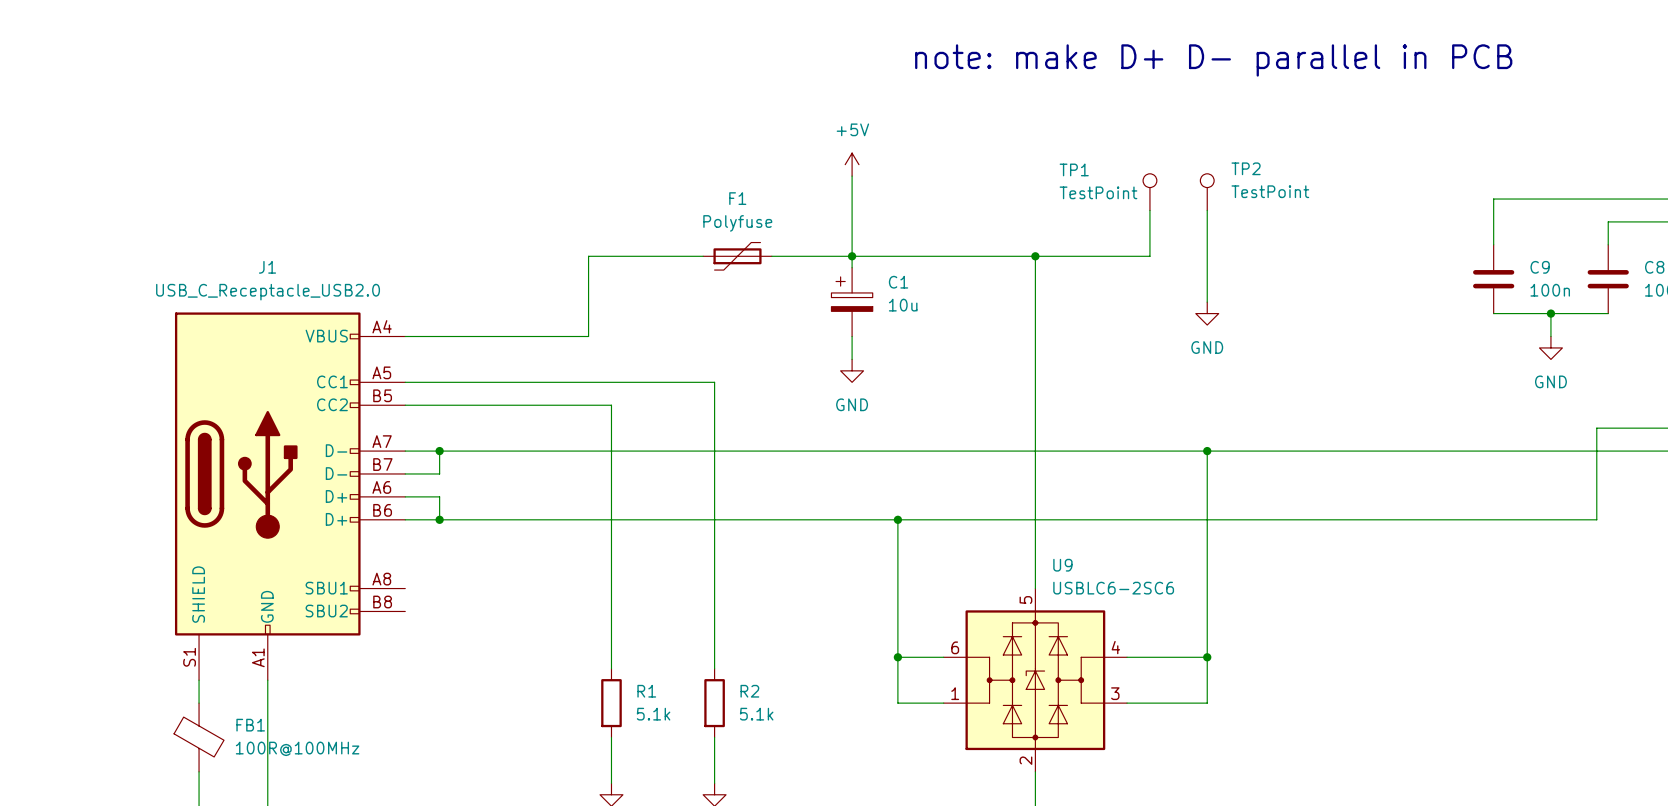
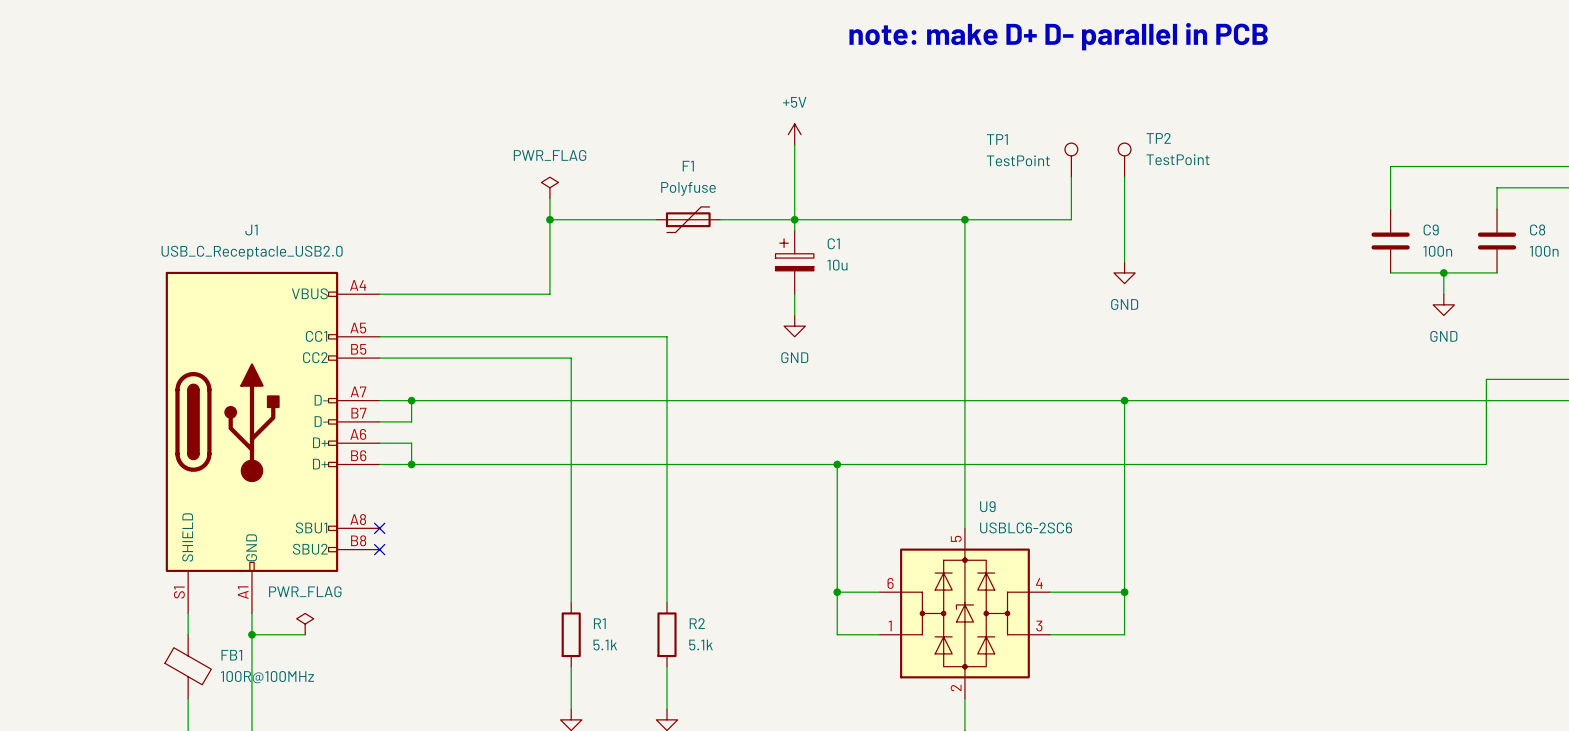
power symbol: none -> PWR_FLAG (549, 187)
wire: none -> (549, 198) (549, 219)
junction: none -> (549, 219)
no-connect mark: none -> (379, 528)
no-connect mark: none -> (379, 549)
power symbol: none -> PWR_FLAG (305, 624)
wire: none -> (251, 634) (305, 634)
junction: none -> (251, 634)

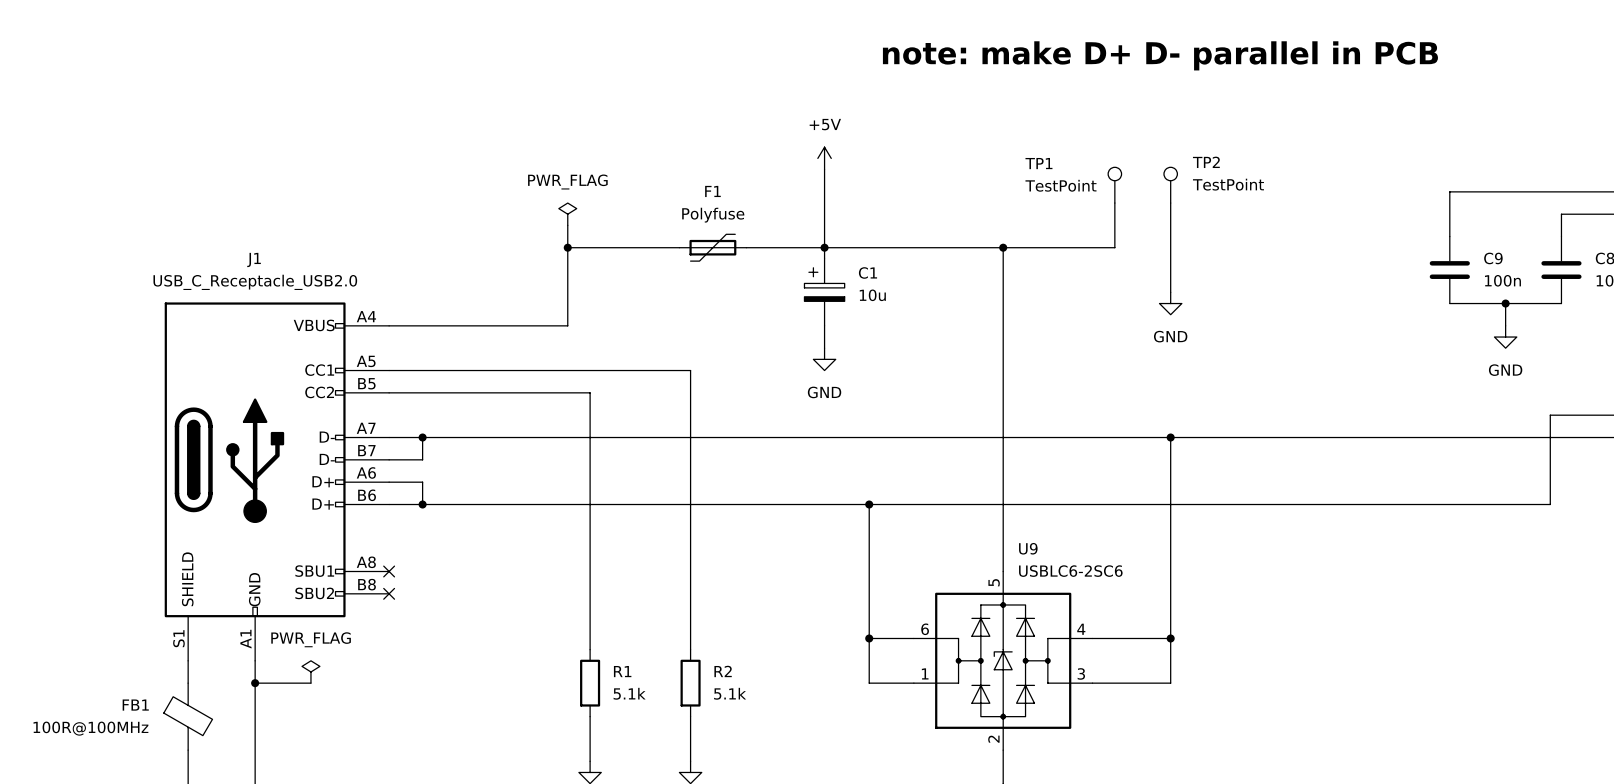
FB1 name position: FB1 (231, 655) -> FB1 (135, 705)
FB1 value position: 100R@100MHz (267, 677) -> 100R@100MHz (90, 728)

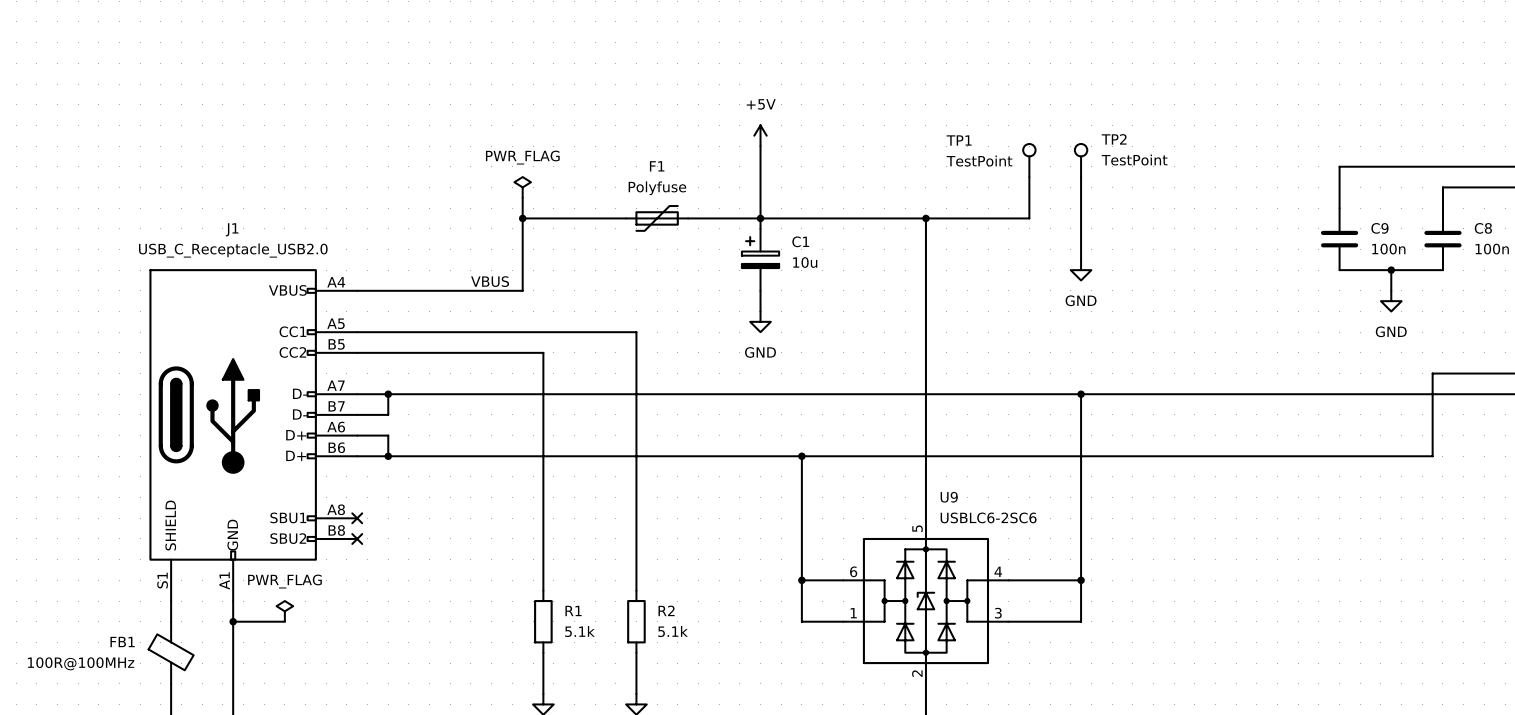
text: note: make D+ D- parallel in PCB (1160, 55) -> none
label: none -> VBUS (490, 281)

